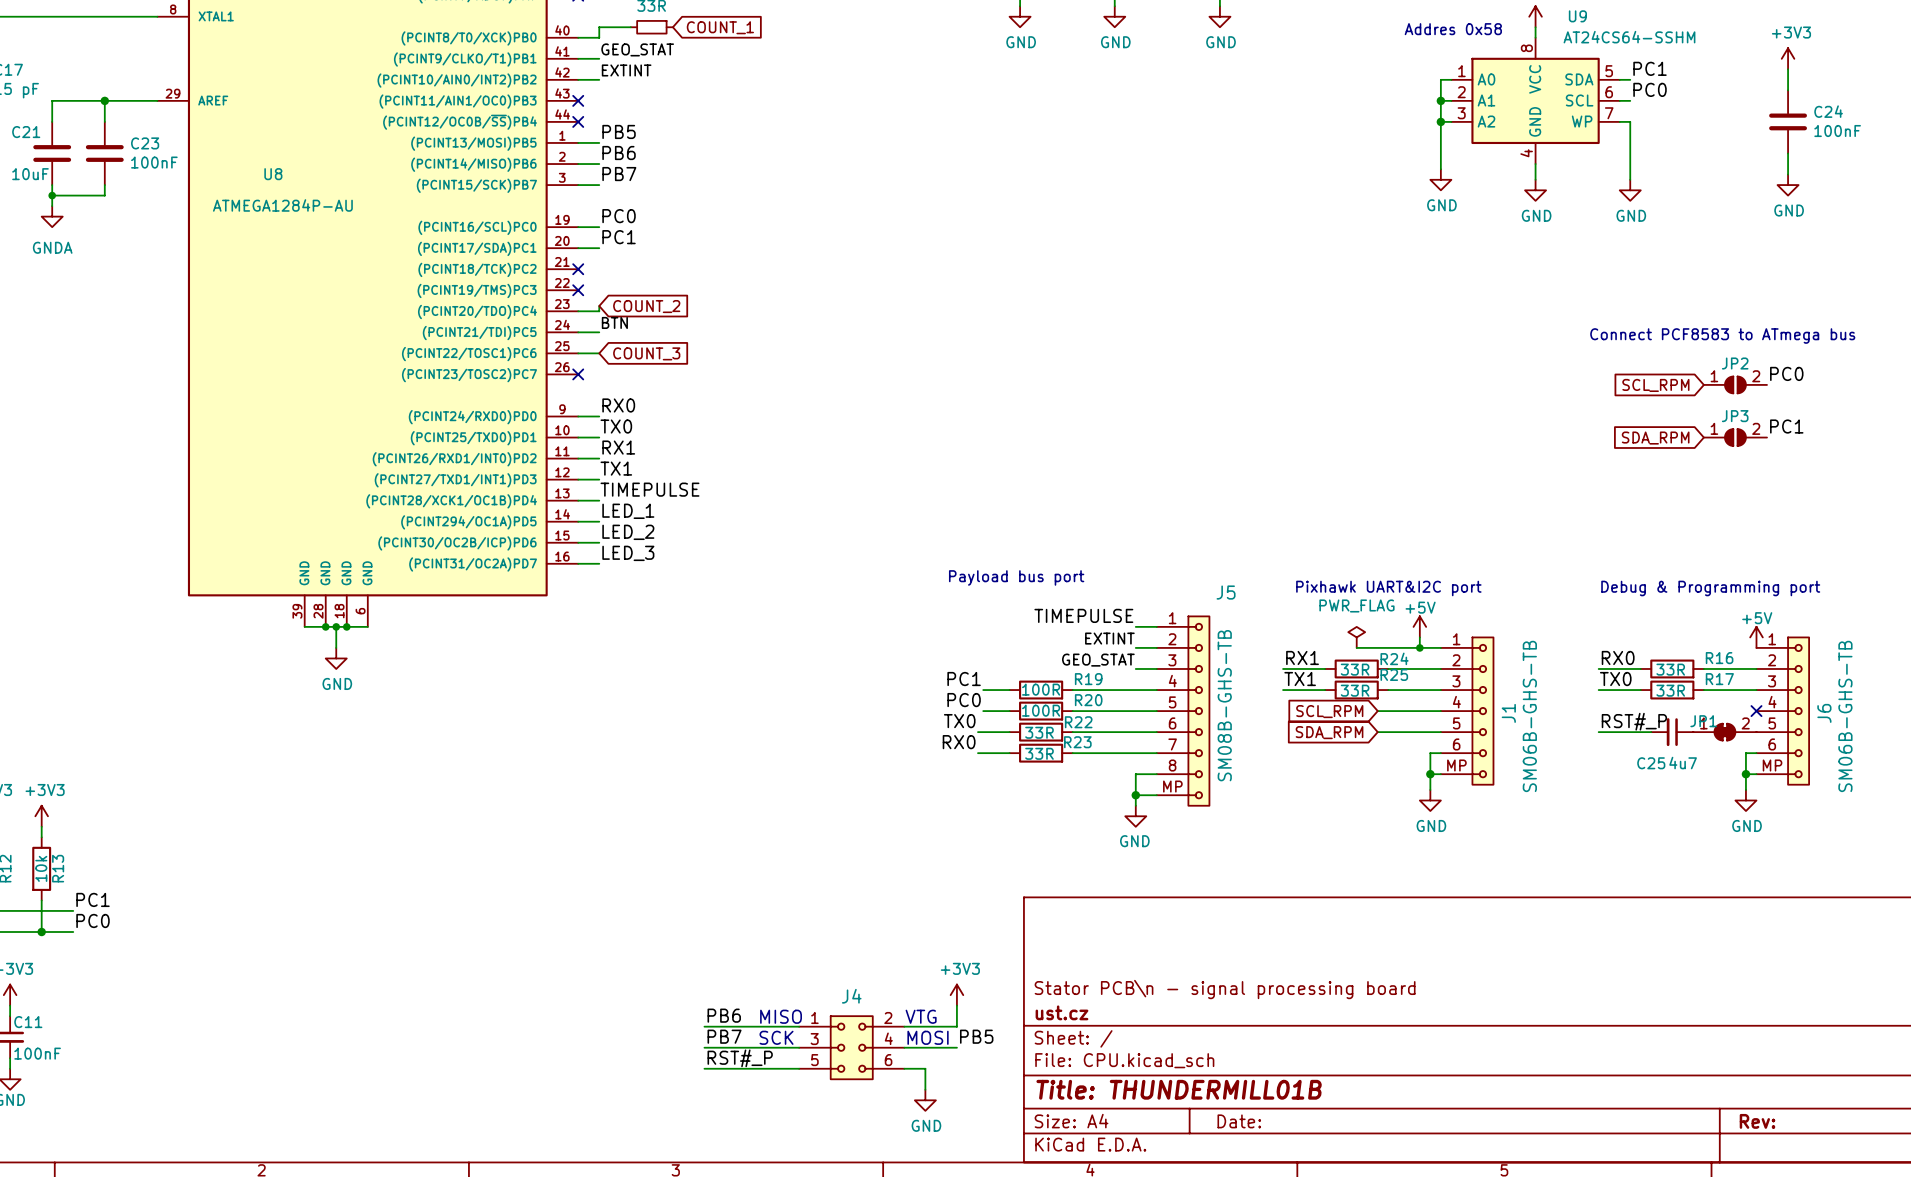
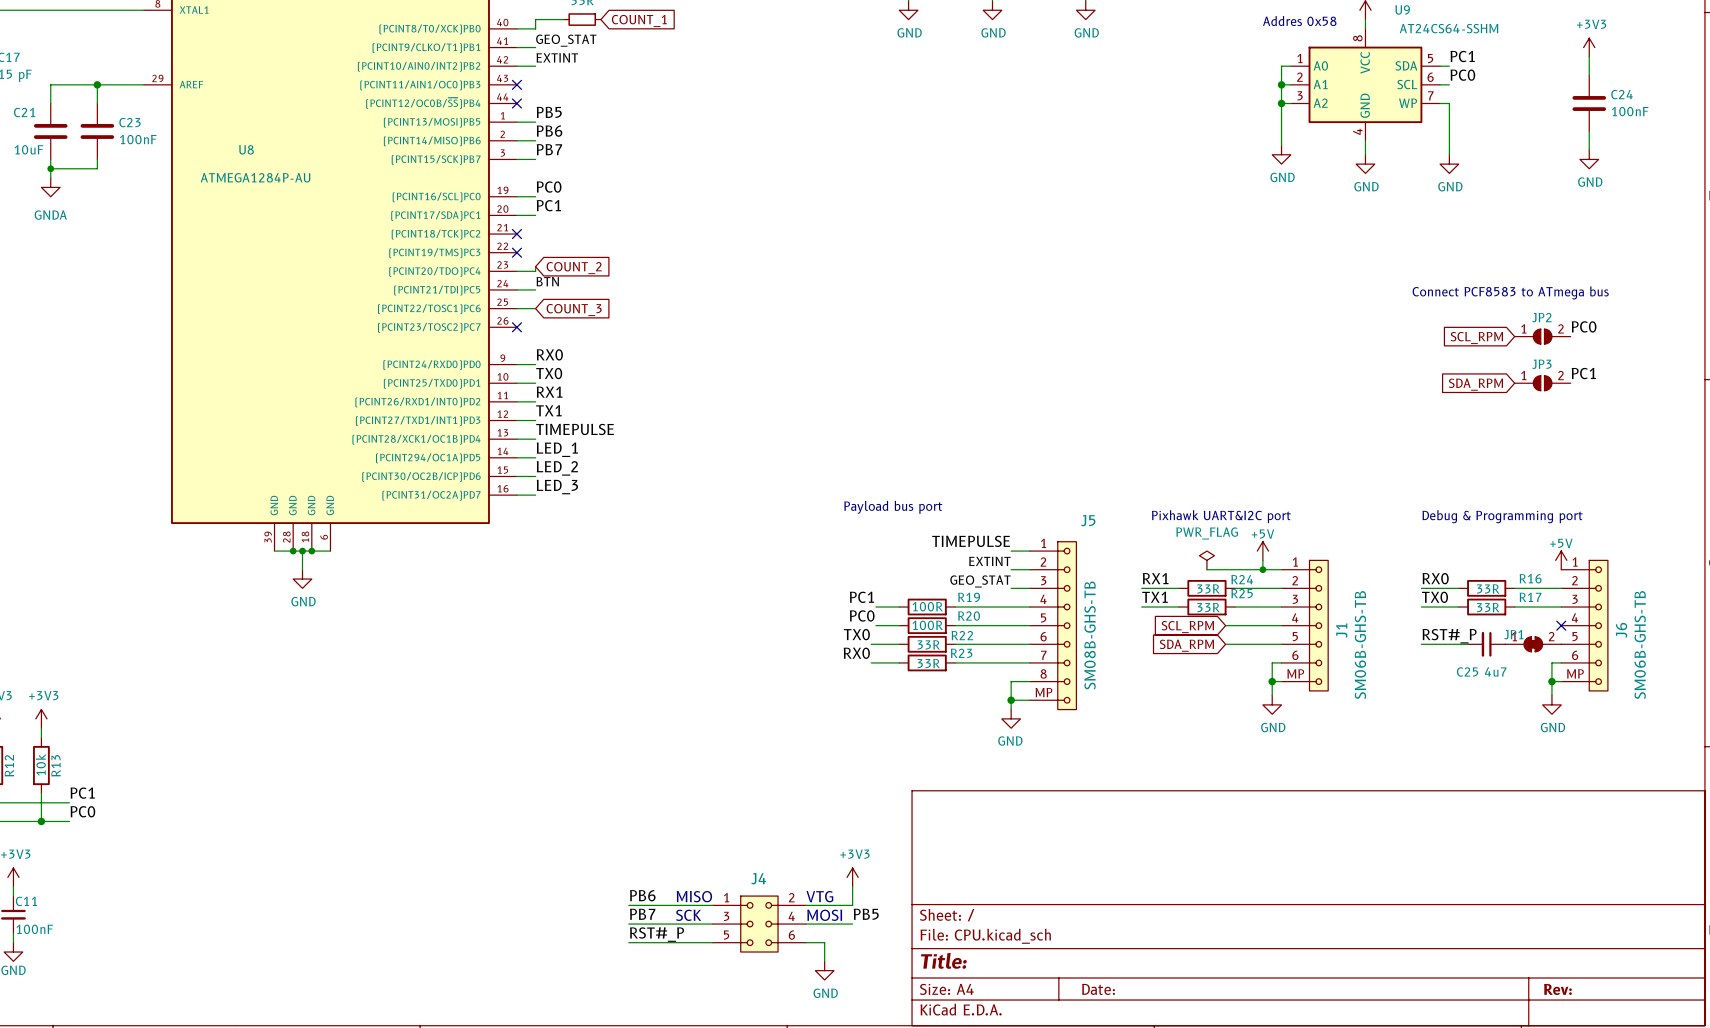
title block: Stator PCB\n - signal processing board (1225, 989) -> none
title block: ust.cz (1061, 1012) -> none
title block: Title: THUNDERMILL01B (1179, 1089) -> Title: (943, 960)

